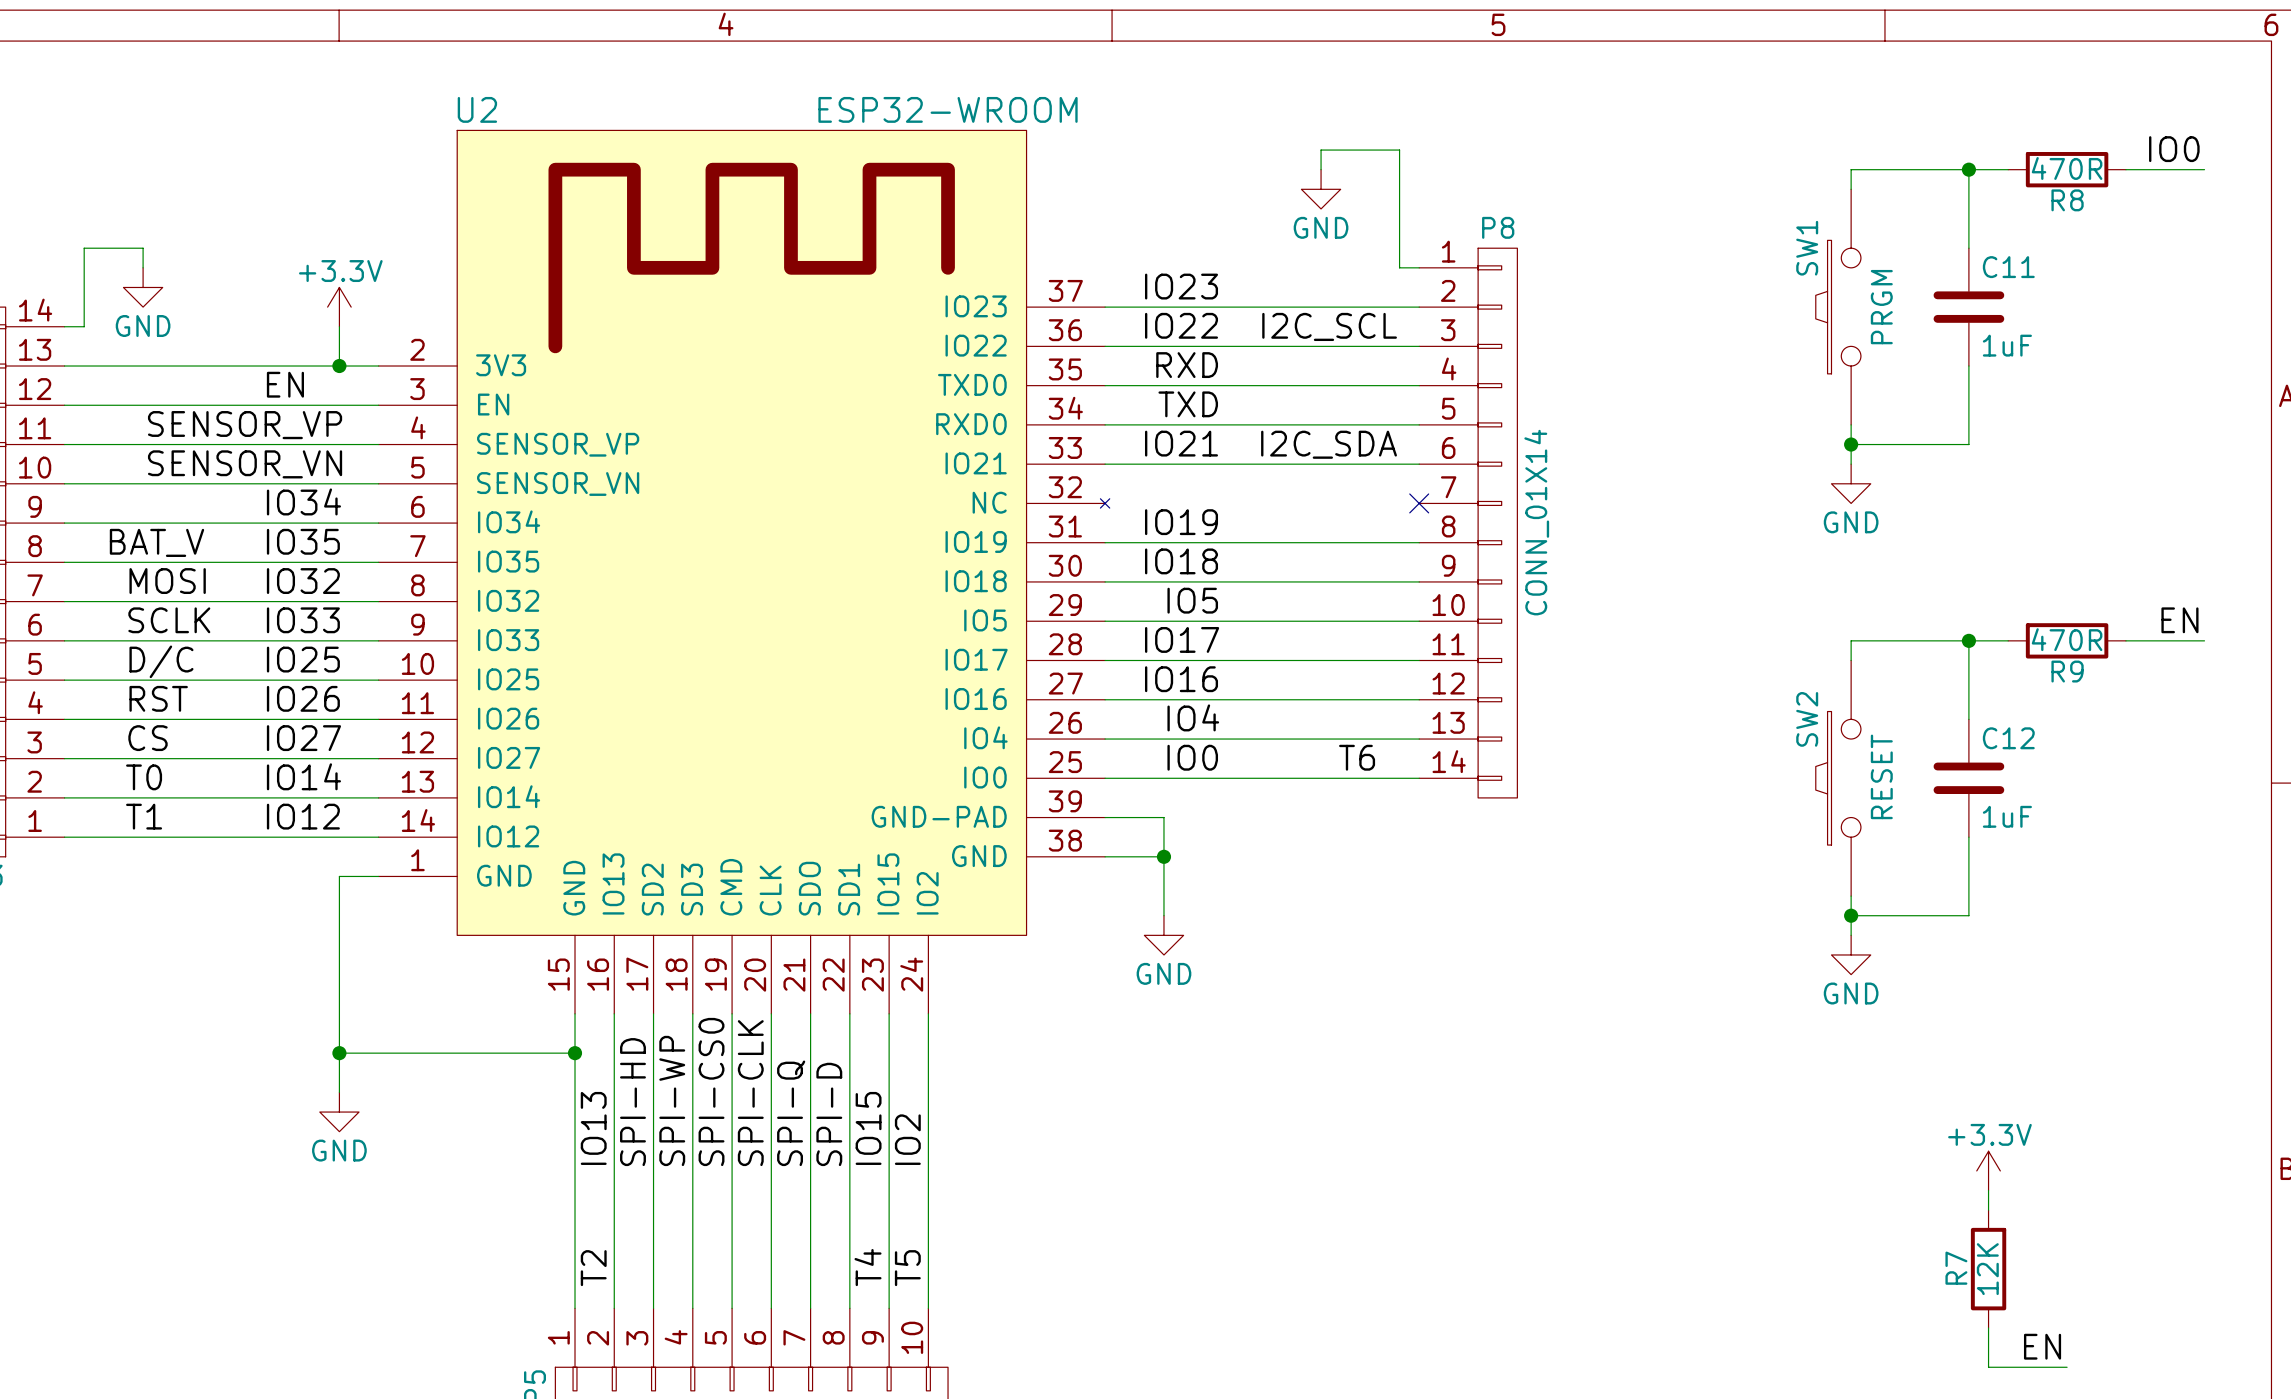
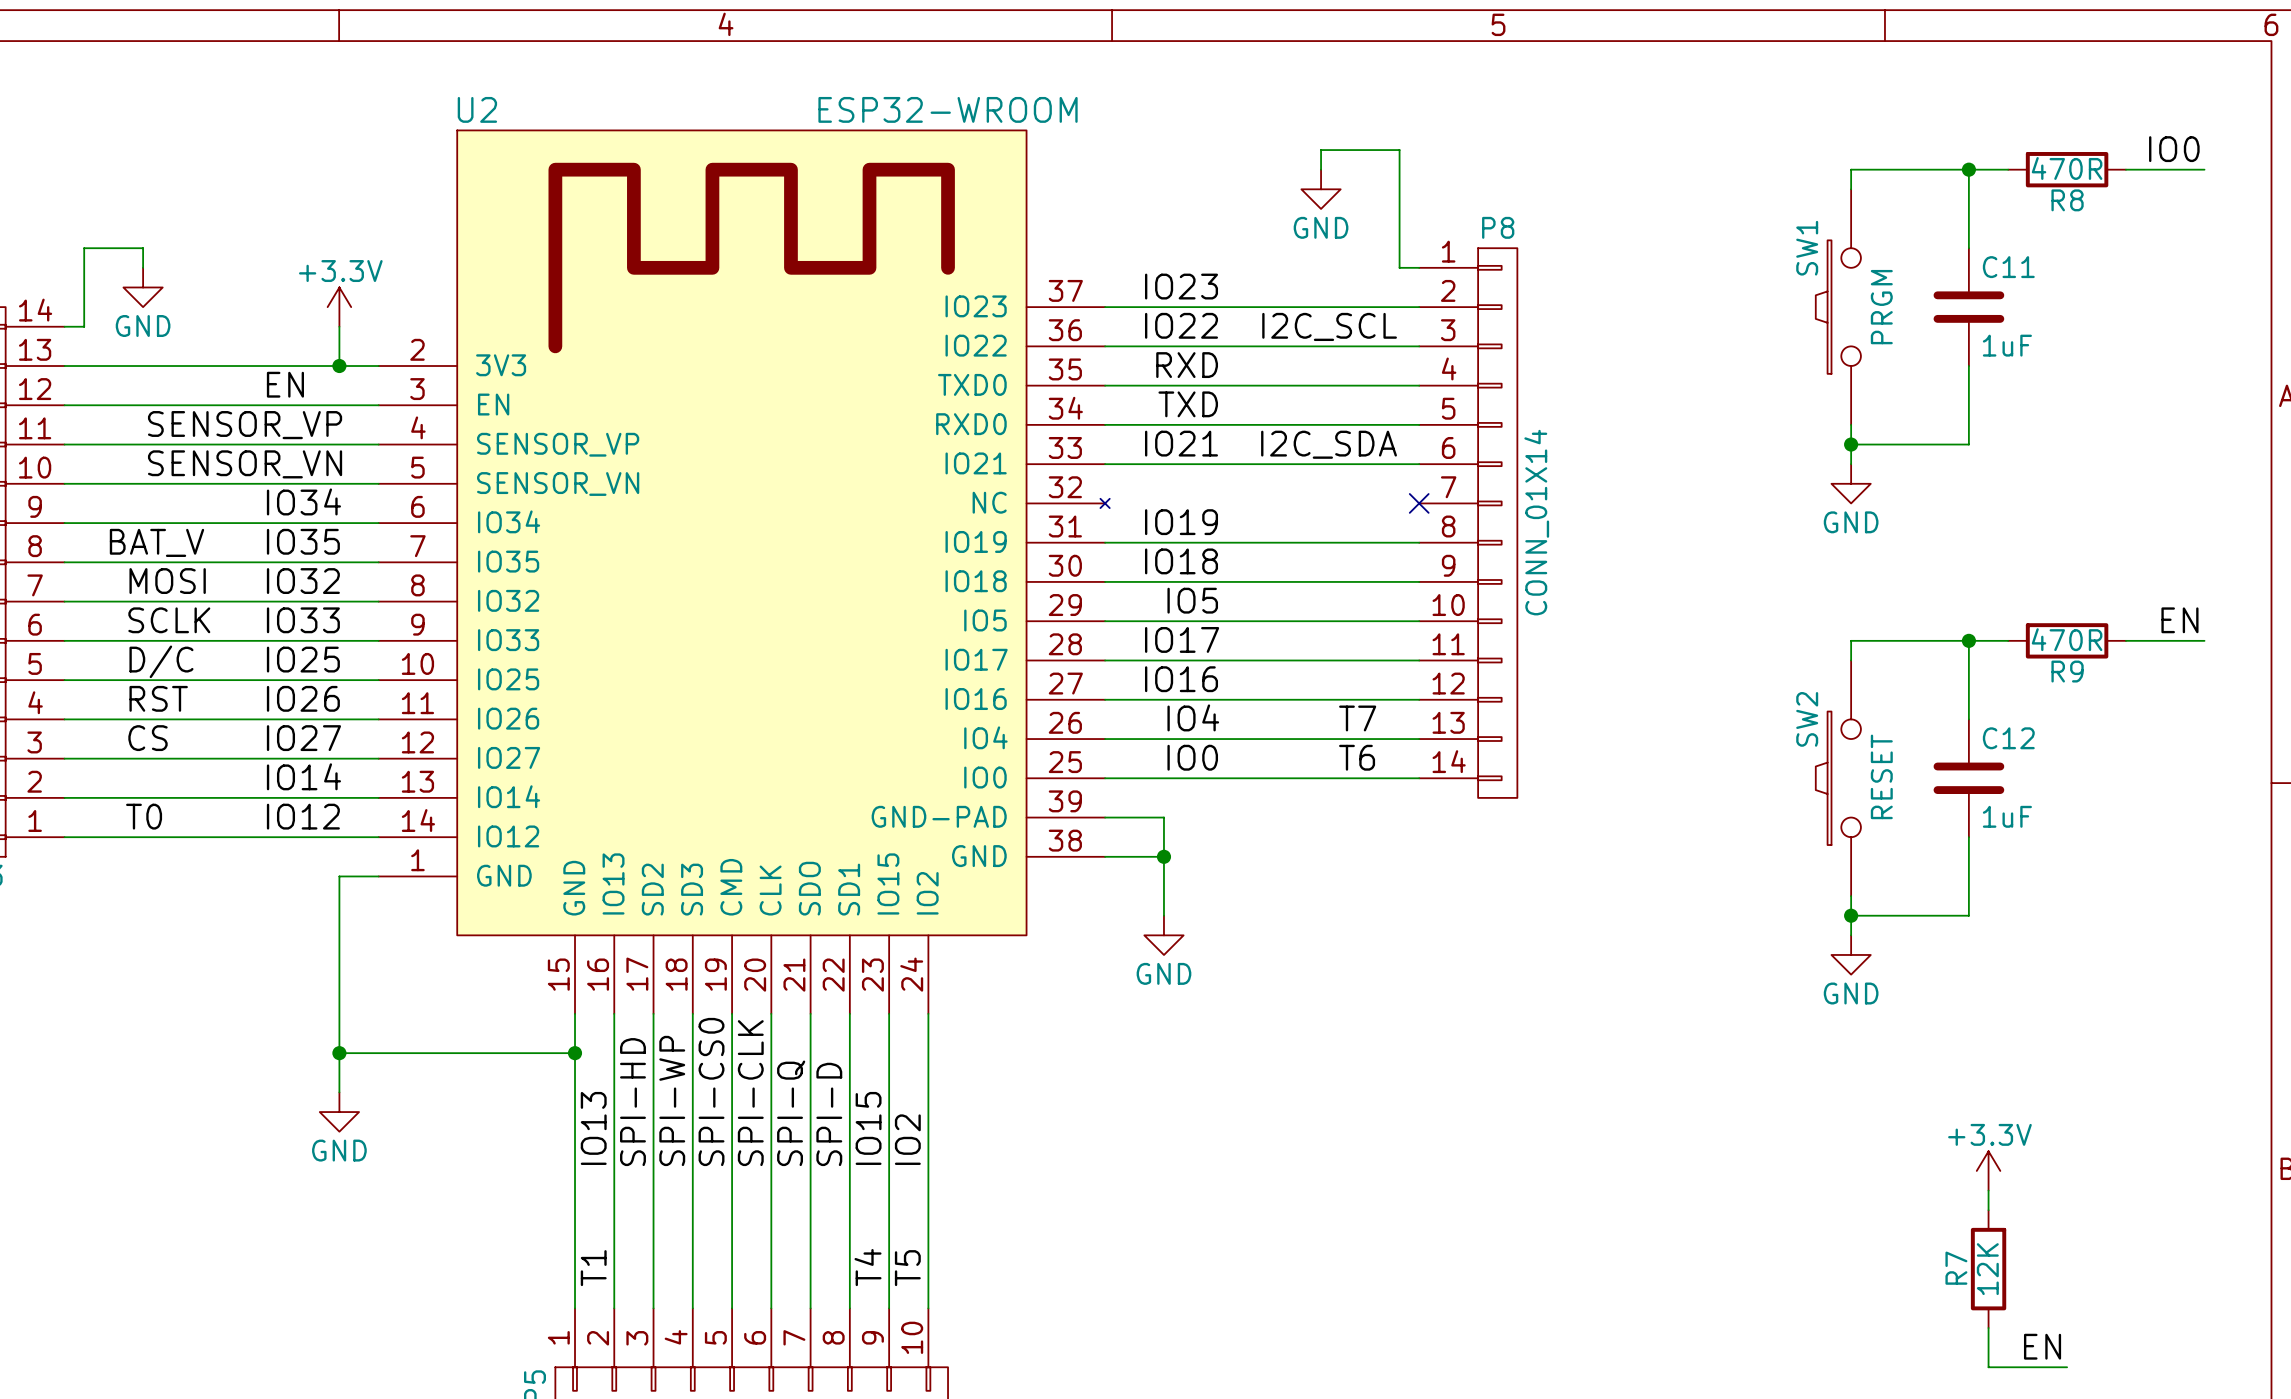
label: none -> T7 (1357, 718)
label: T0 (144, 777) -> none
label: T1 (144, 816) -> T0 (144, 816)
label: T2 (593, 1268) -> T1 (593, 1268)

